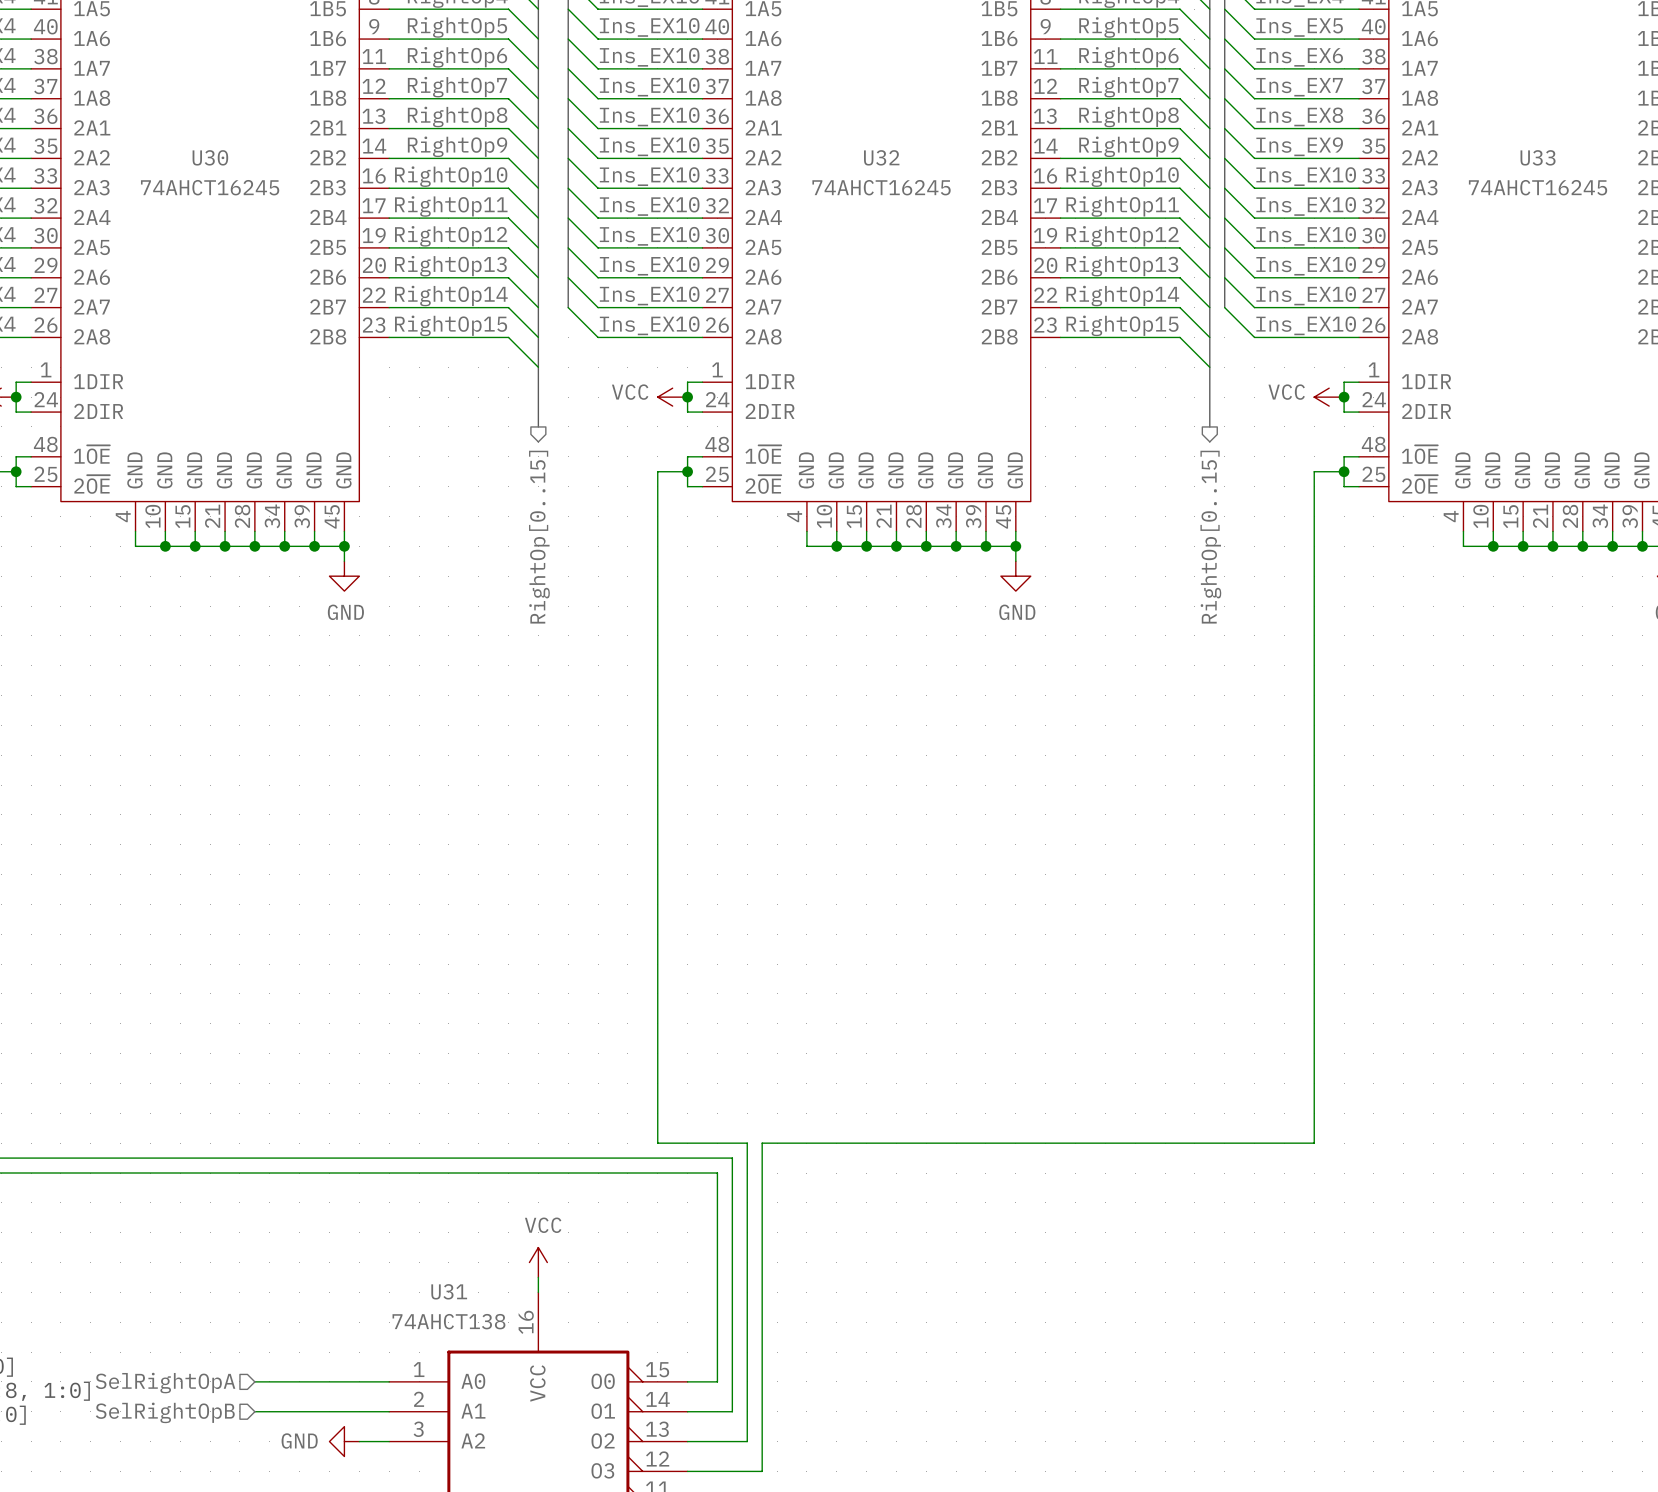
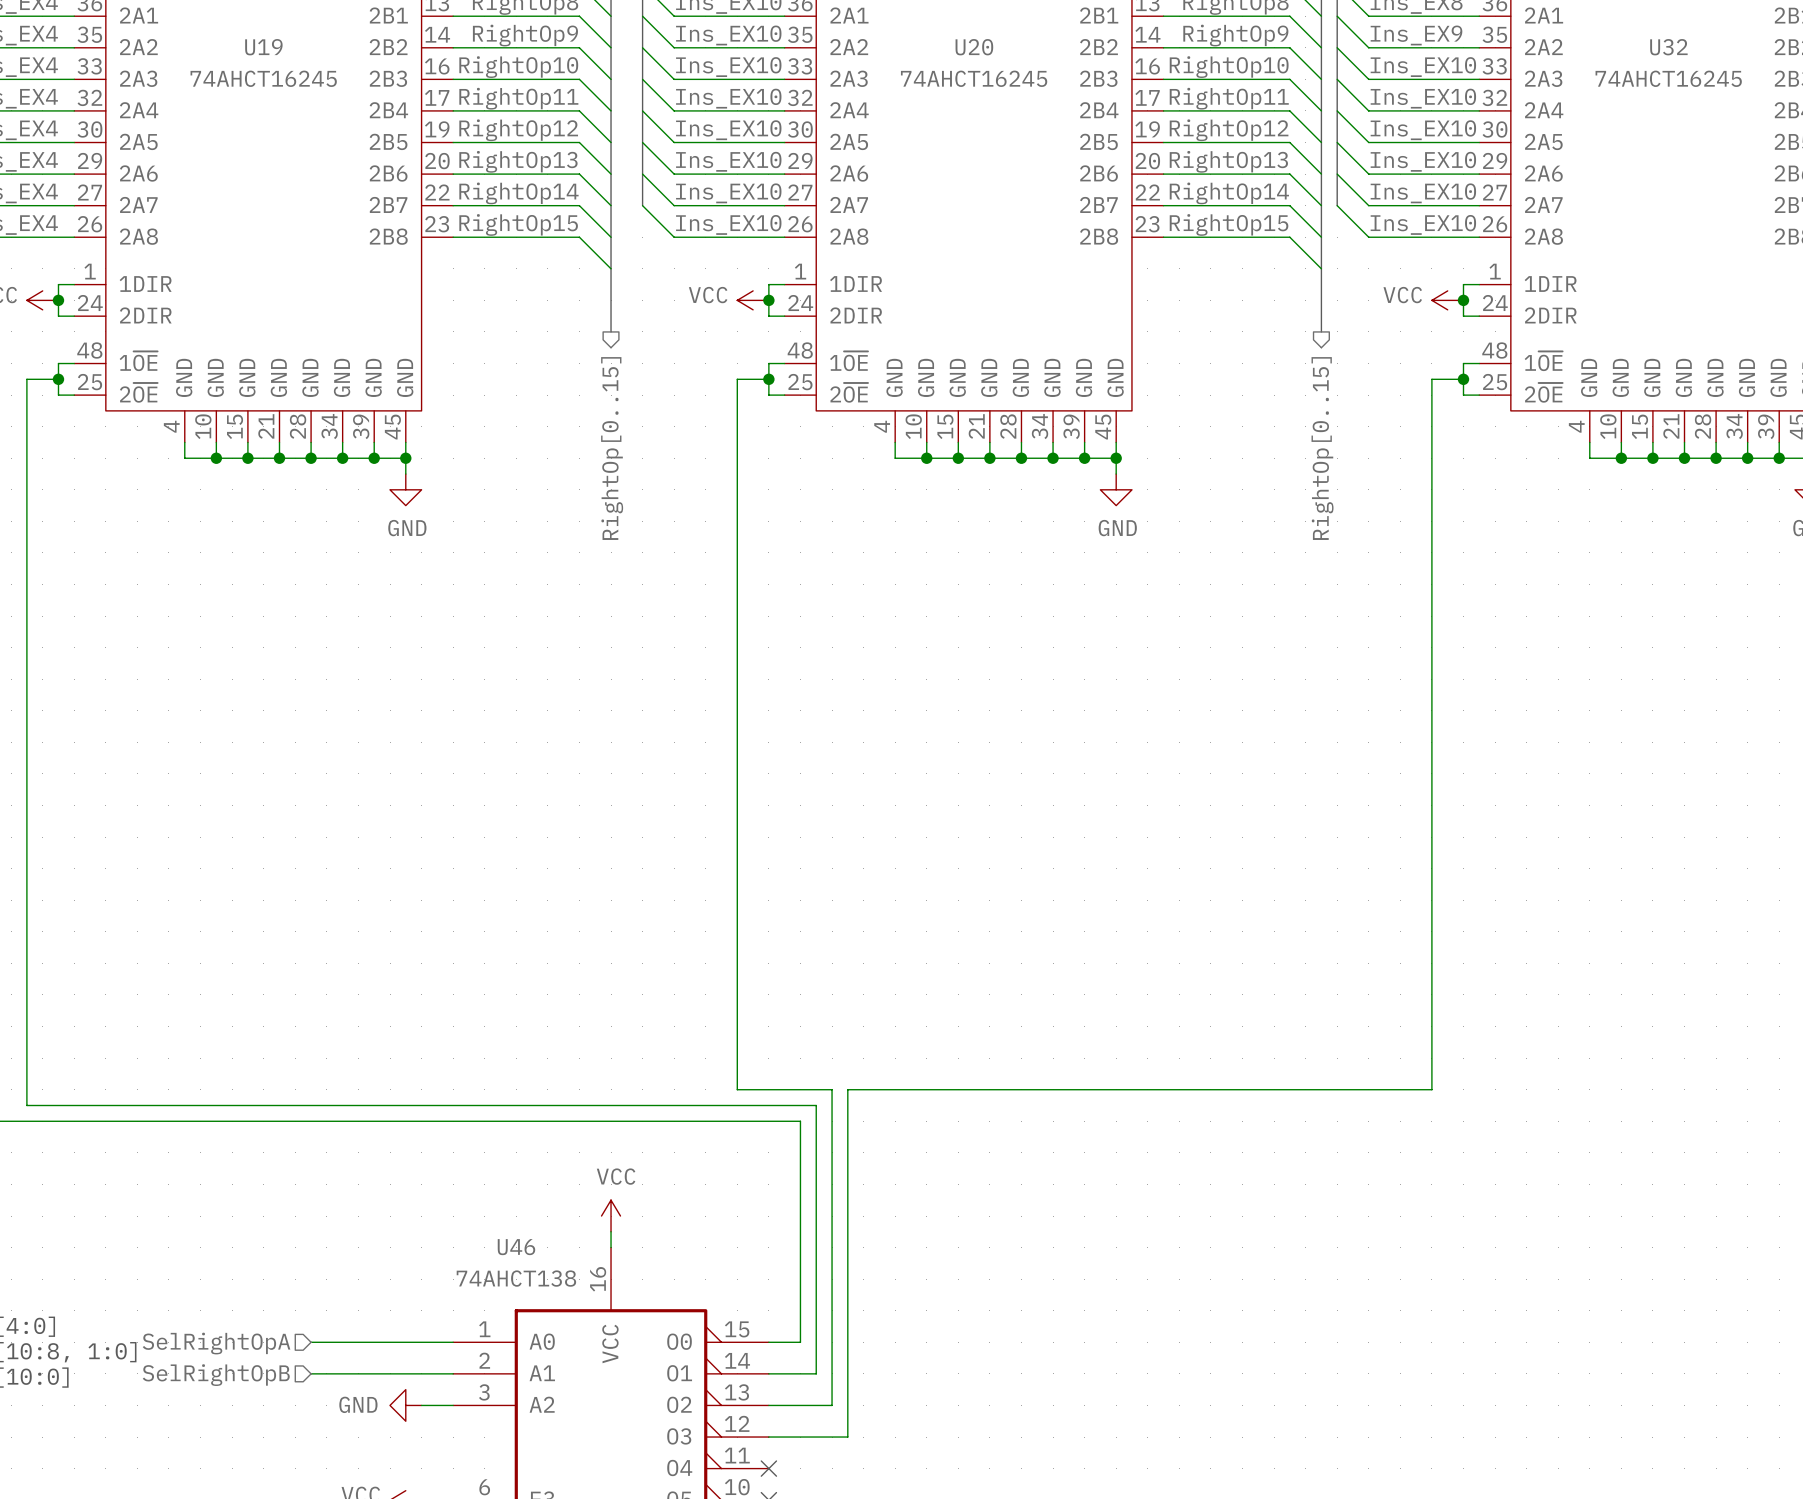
U30 name: U30 (210, 157) -> U19 (263, 47)
U32 name: U32 (881, 157) -> U20 (974, 47)
U33 name: U33 (1538, 157) -> U32 (1668, 47)
U31 name: U31 (449, 1291) -> U46 (516, 1247)

